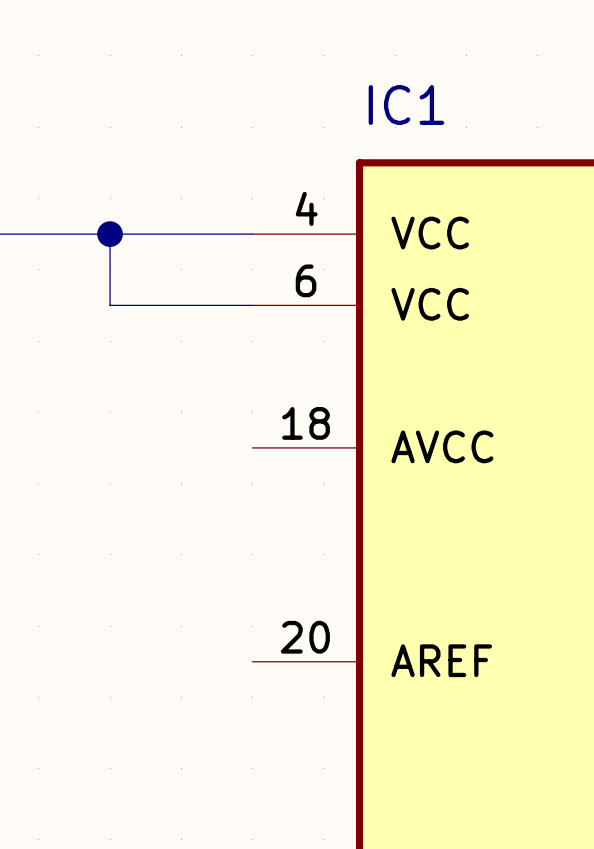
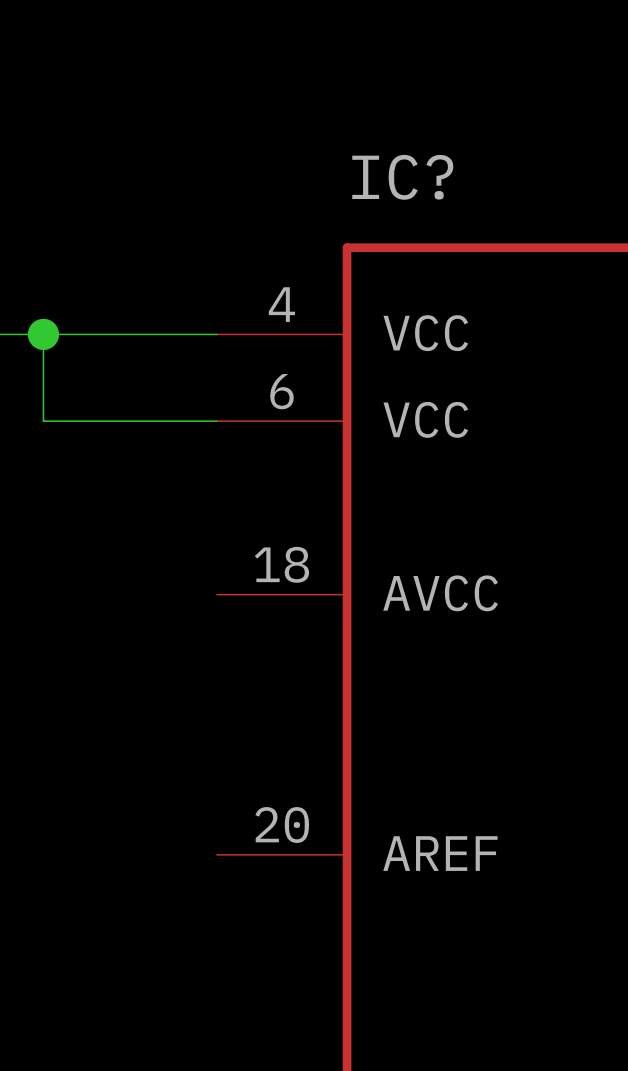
IC1 name: IC1 (406, 105) -> IC? (402, 177)

